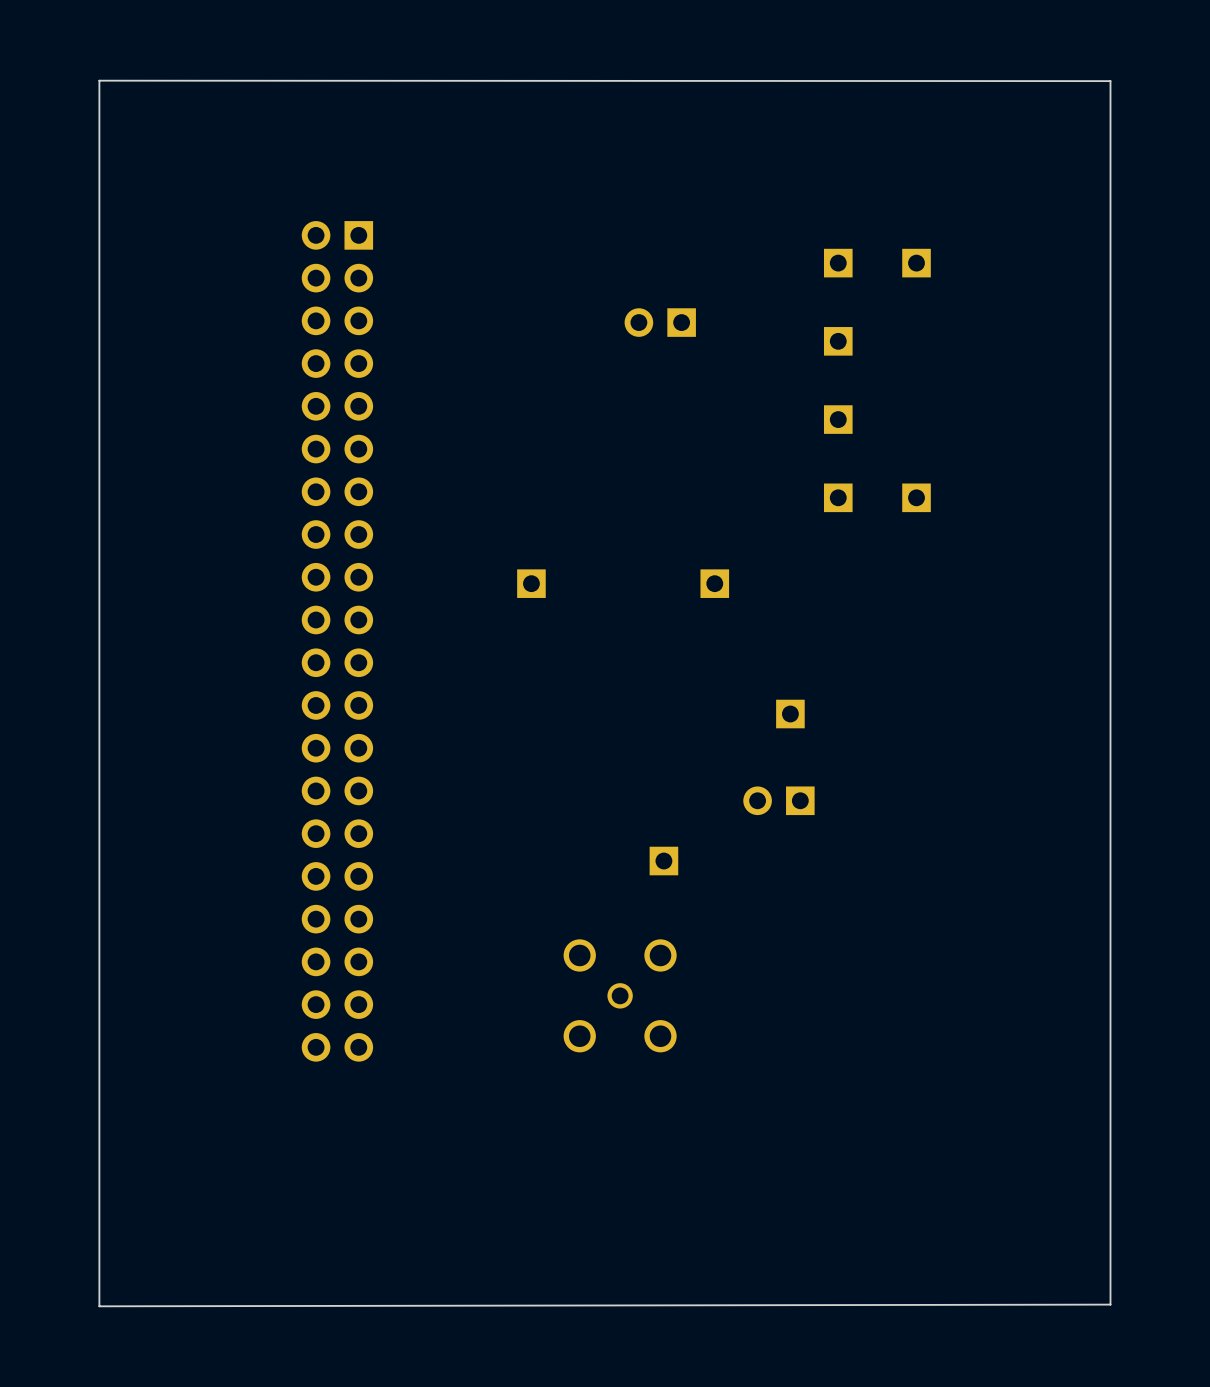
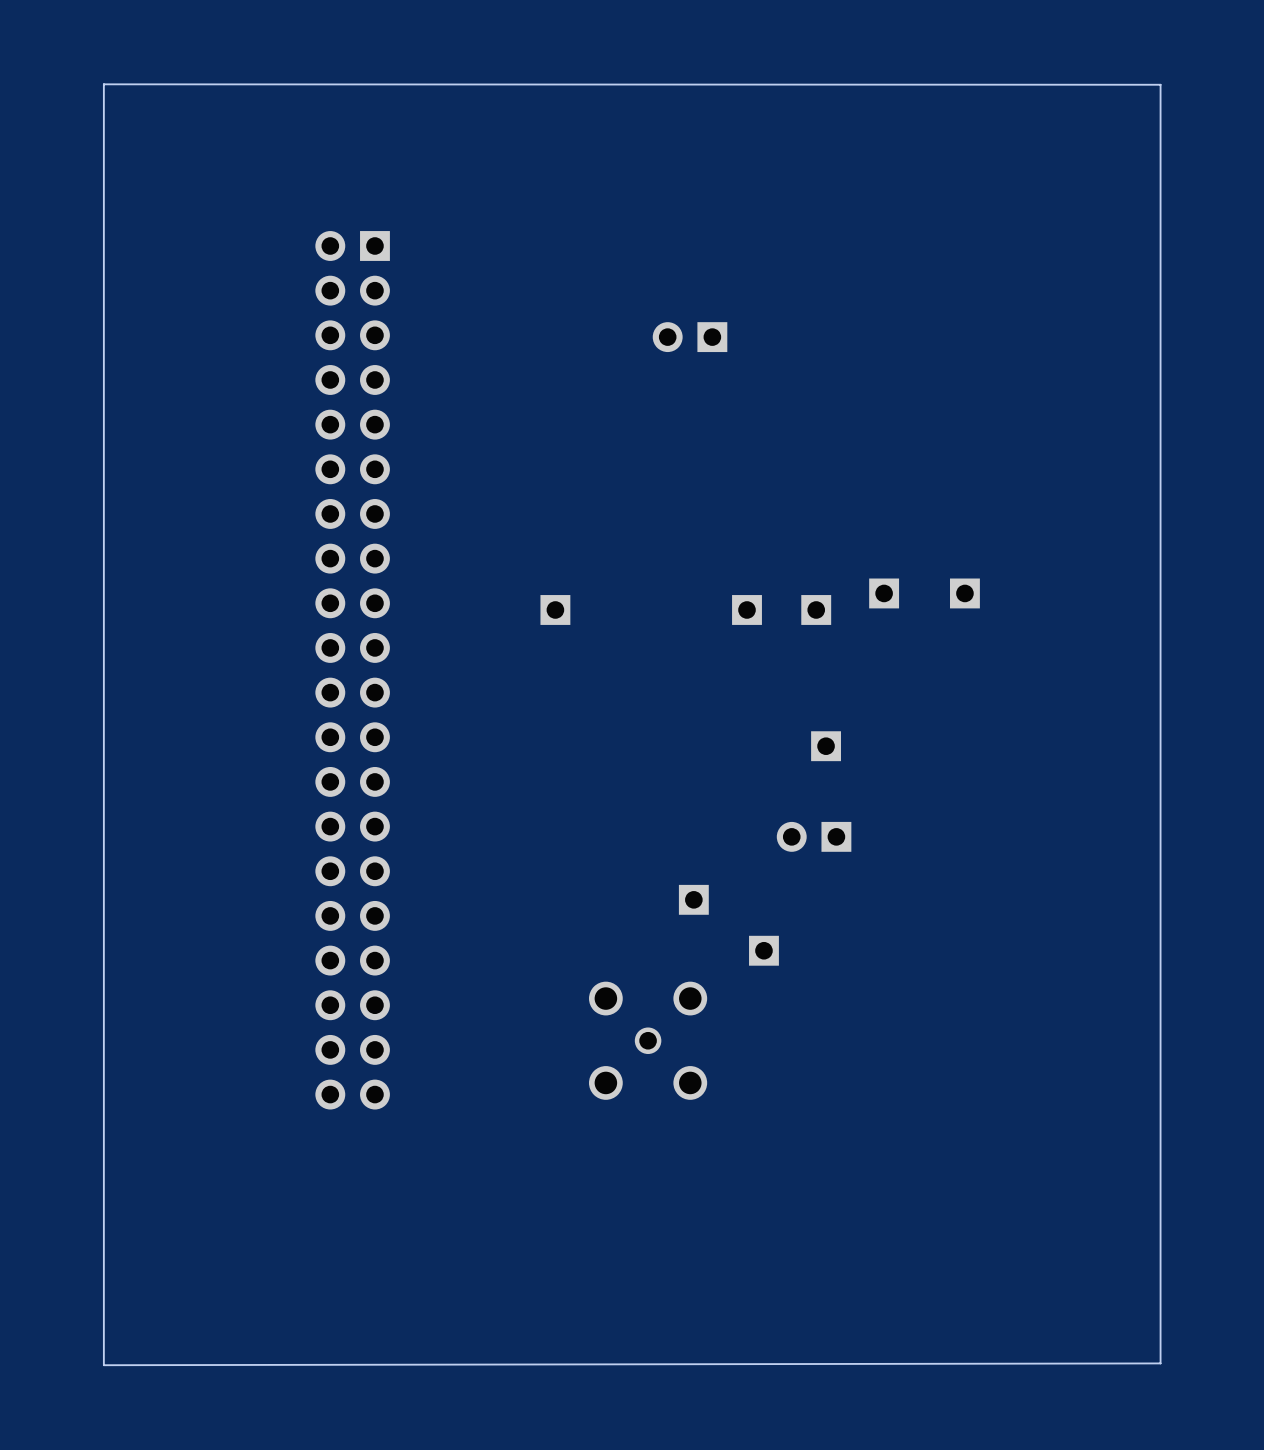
part: (838, 263) -> none
part: (916, 263) -> none
part: (838, 341) -> none
part: (838, 419) -> none
part: (838, 497) -> none
part: (916, 497) -> none
part: none -> (884, 593)
part: none -> (964, 593)
part: none -> (816, 609)
part: none -> (763, 950)

